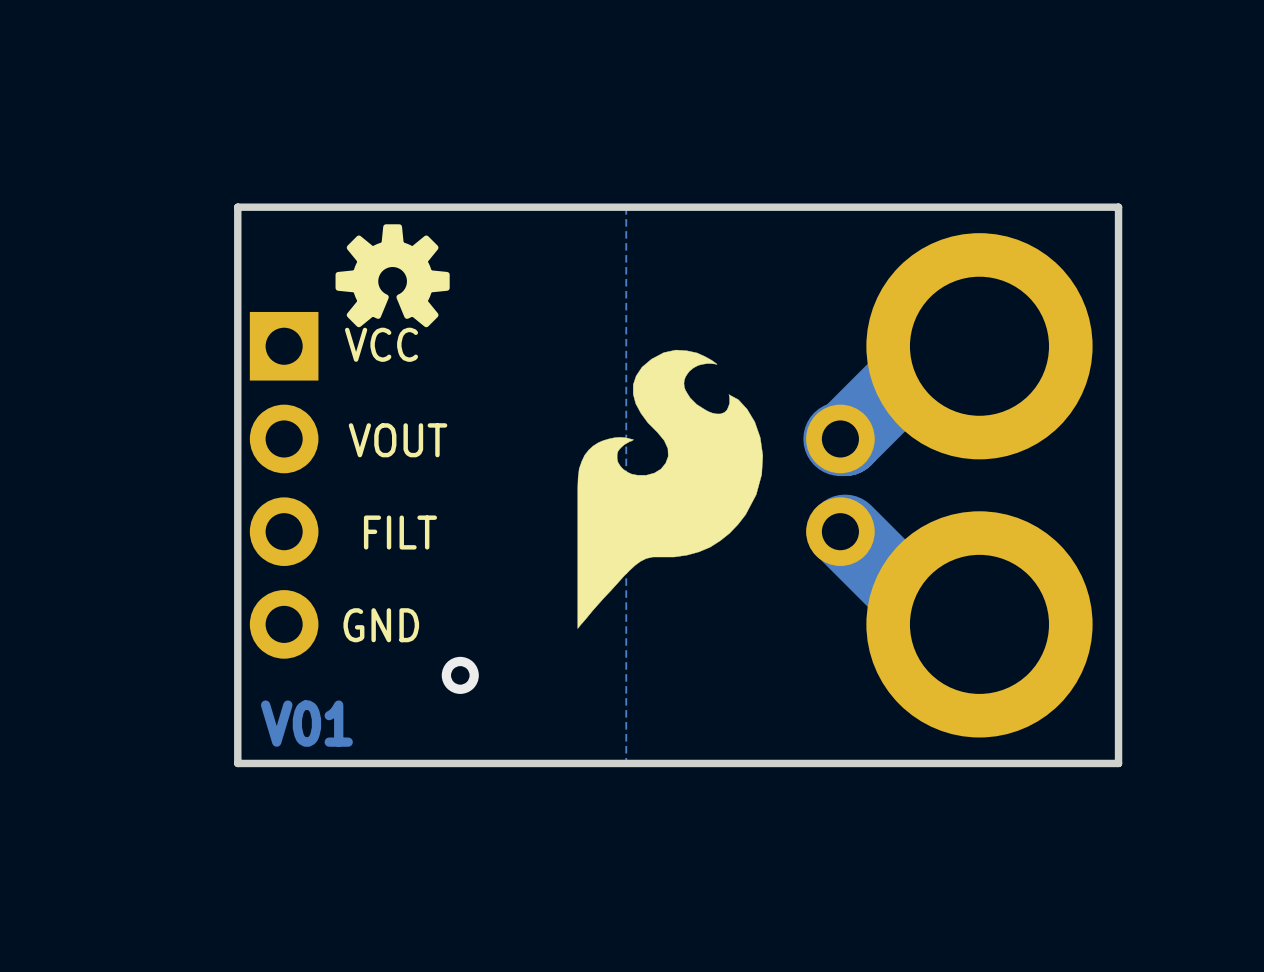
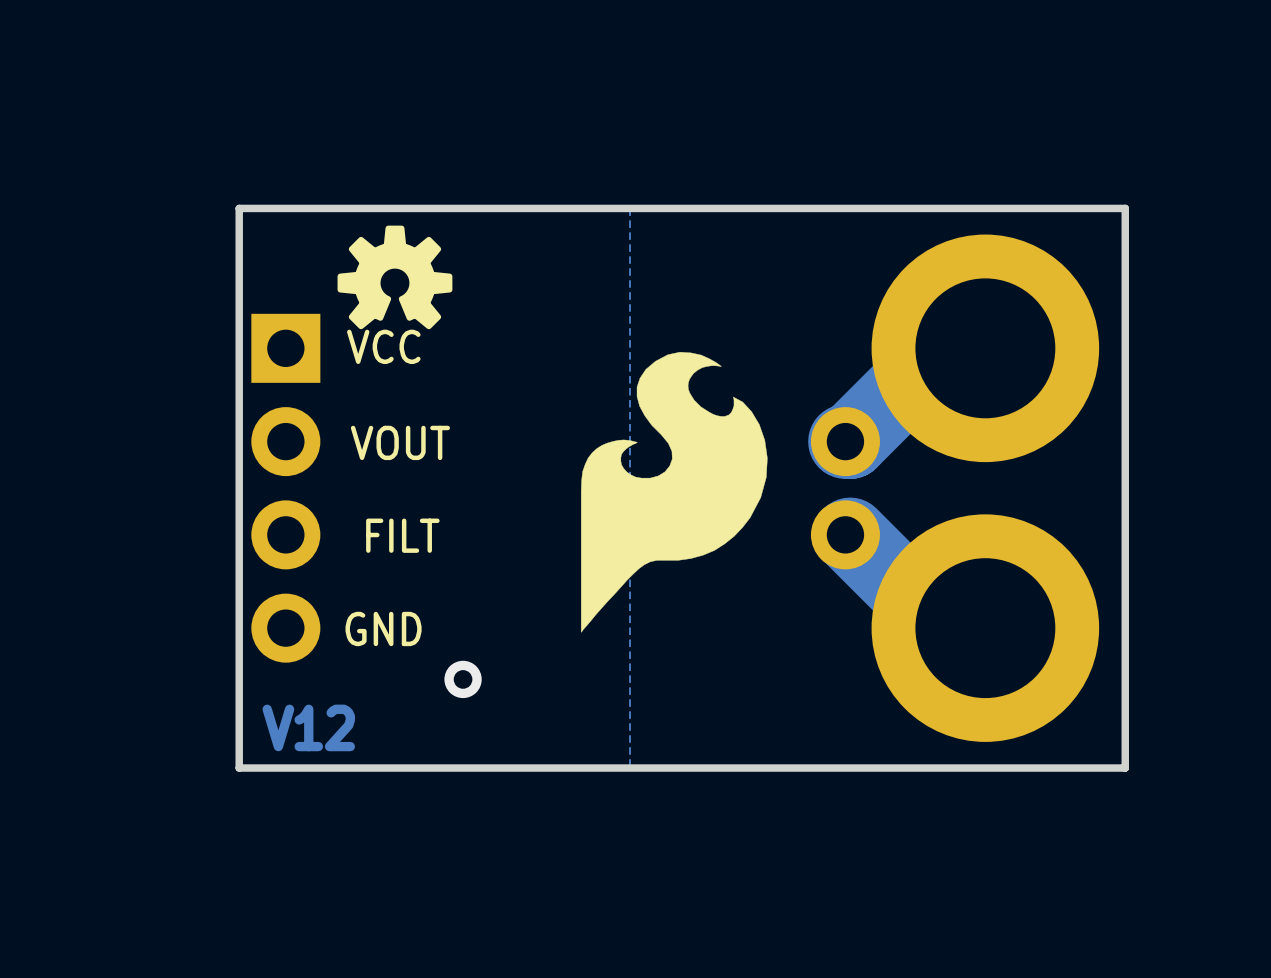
text: V01 (306, 723) -> V12 (308, 727)

